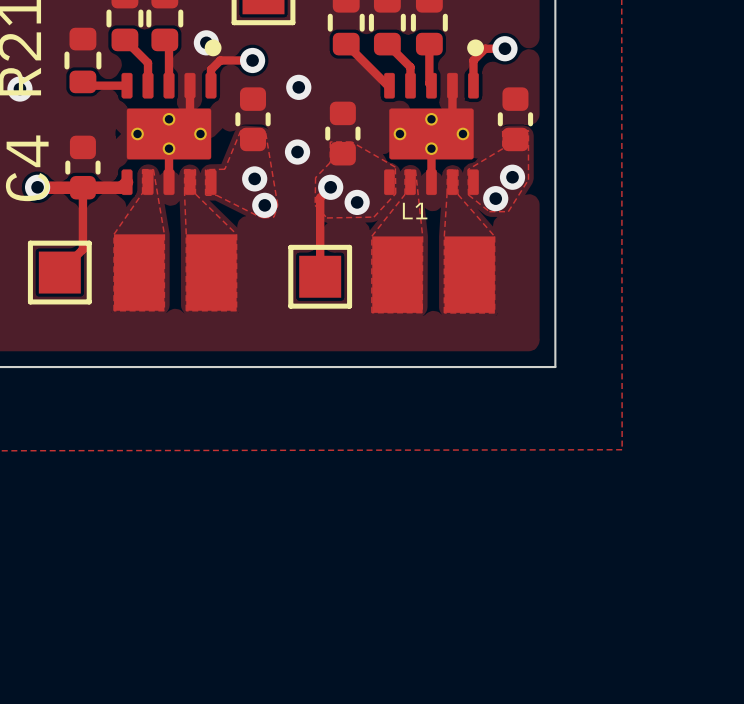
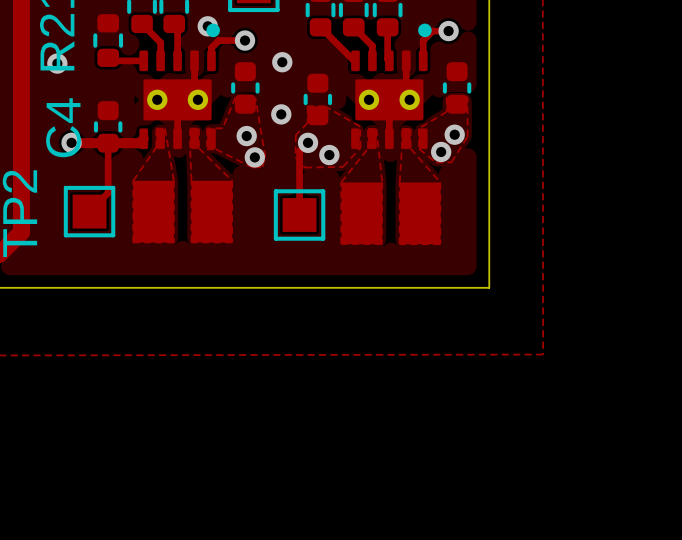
part footprint: [121, 39, 222, 196] -> [139, 23, 220, 150]
part footprint: [384, 39, 484, 196] -> [351, 23, 432, 150]
L1 name: L1 (415, 211) -> none

